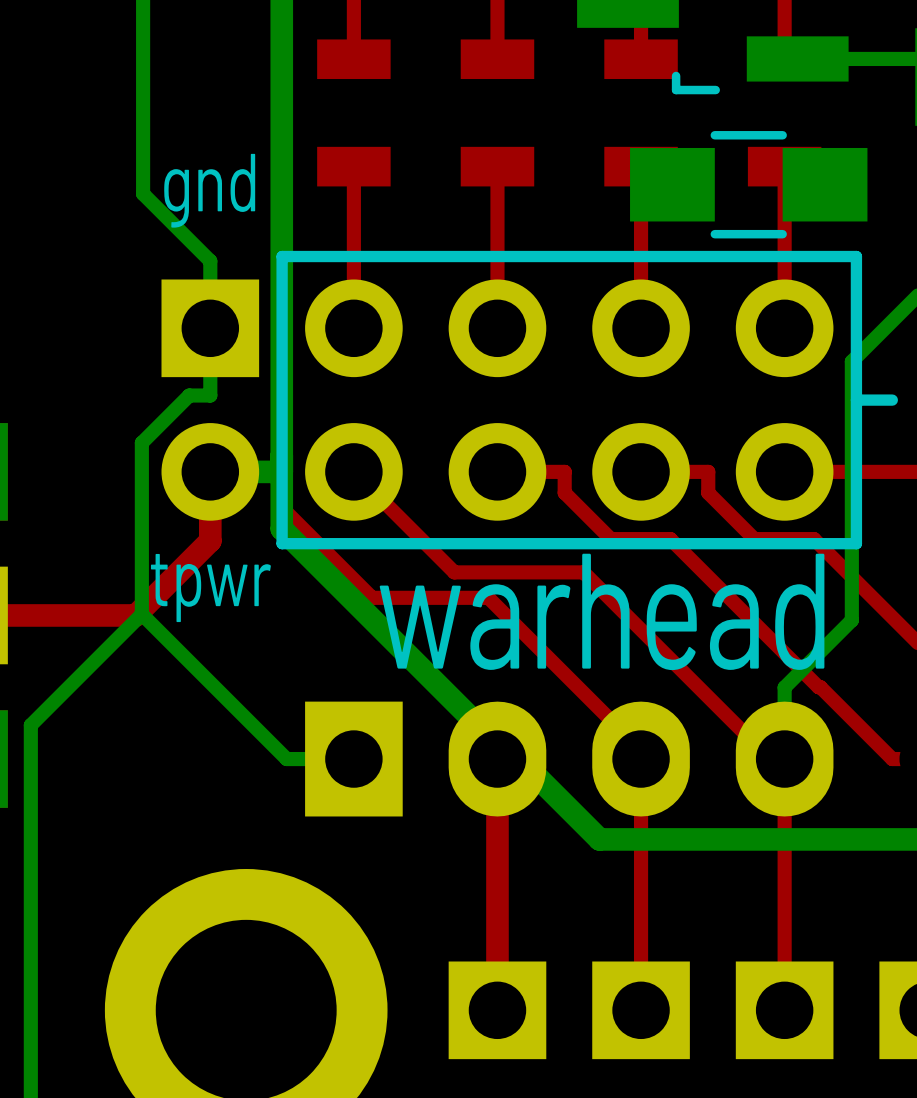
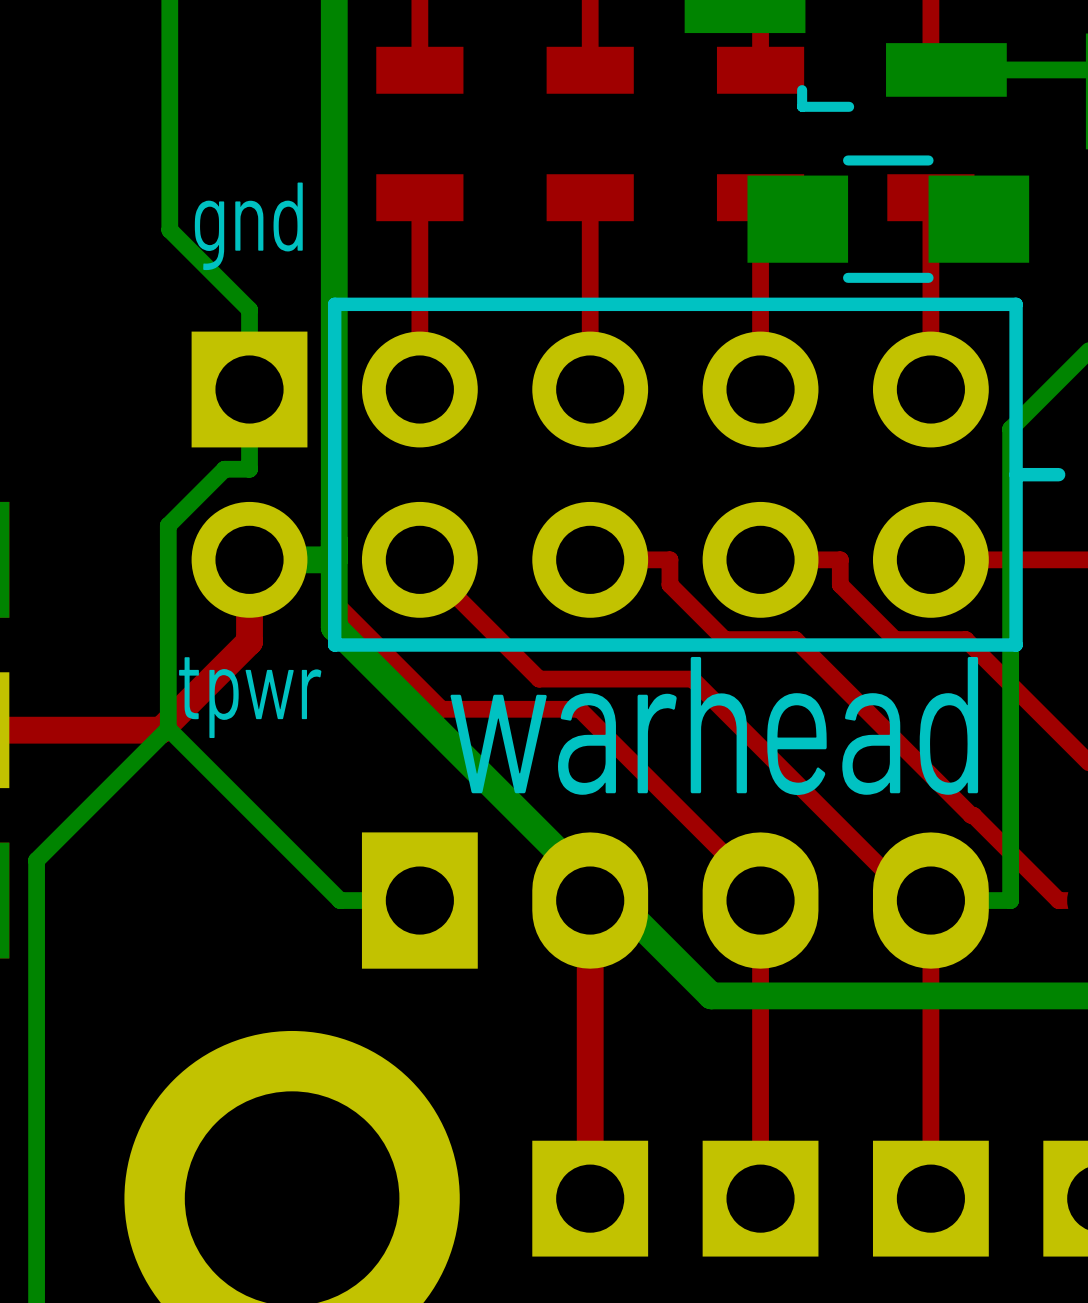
bottom track: (851, 620) (784, 687) (784, 759) -> (1010, 735) (1010, 900) (930, 900)

